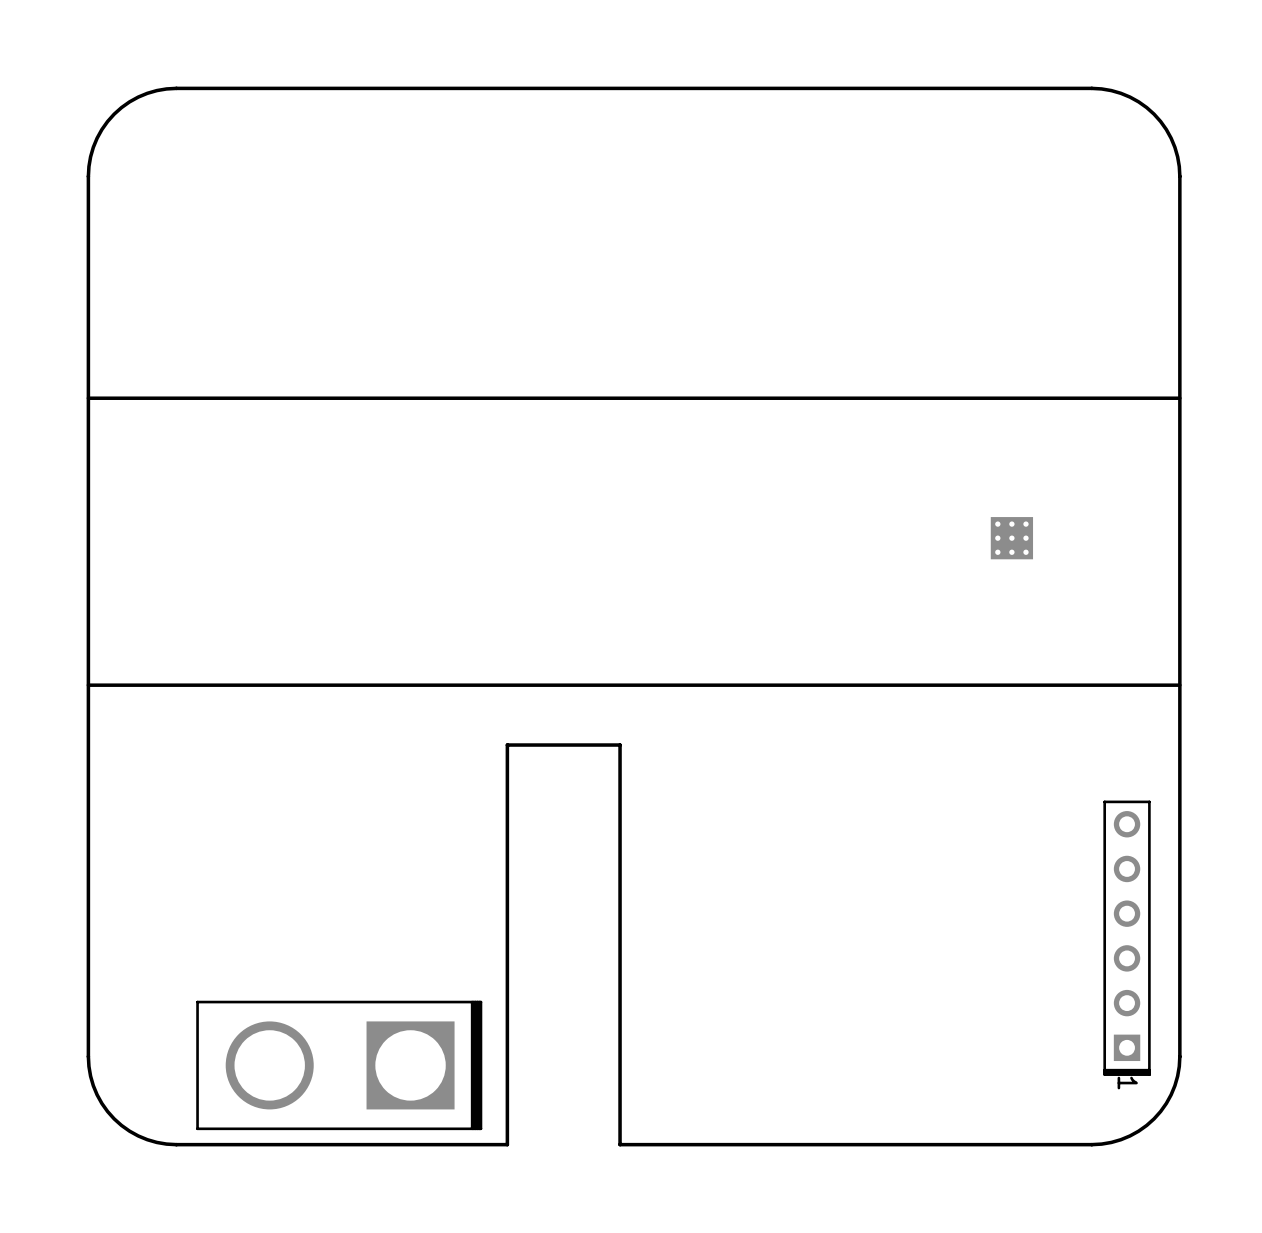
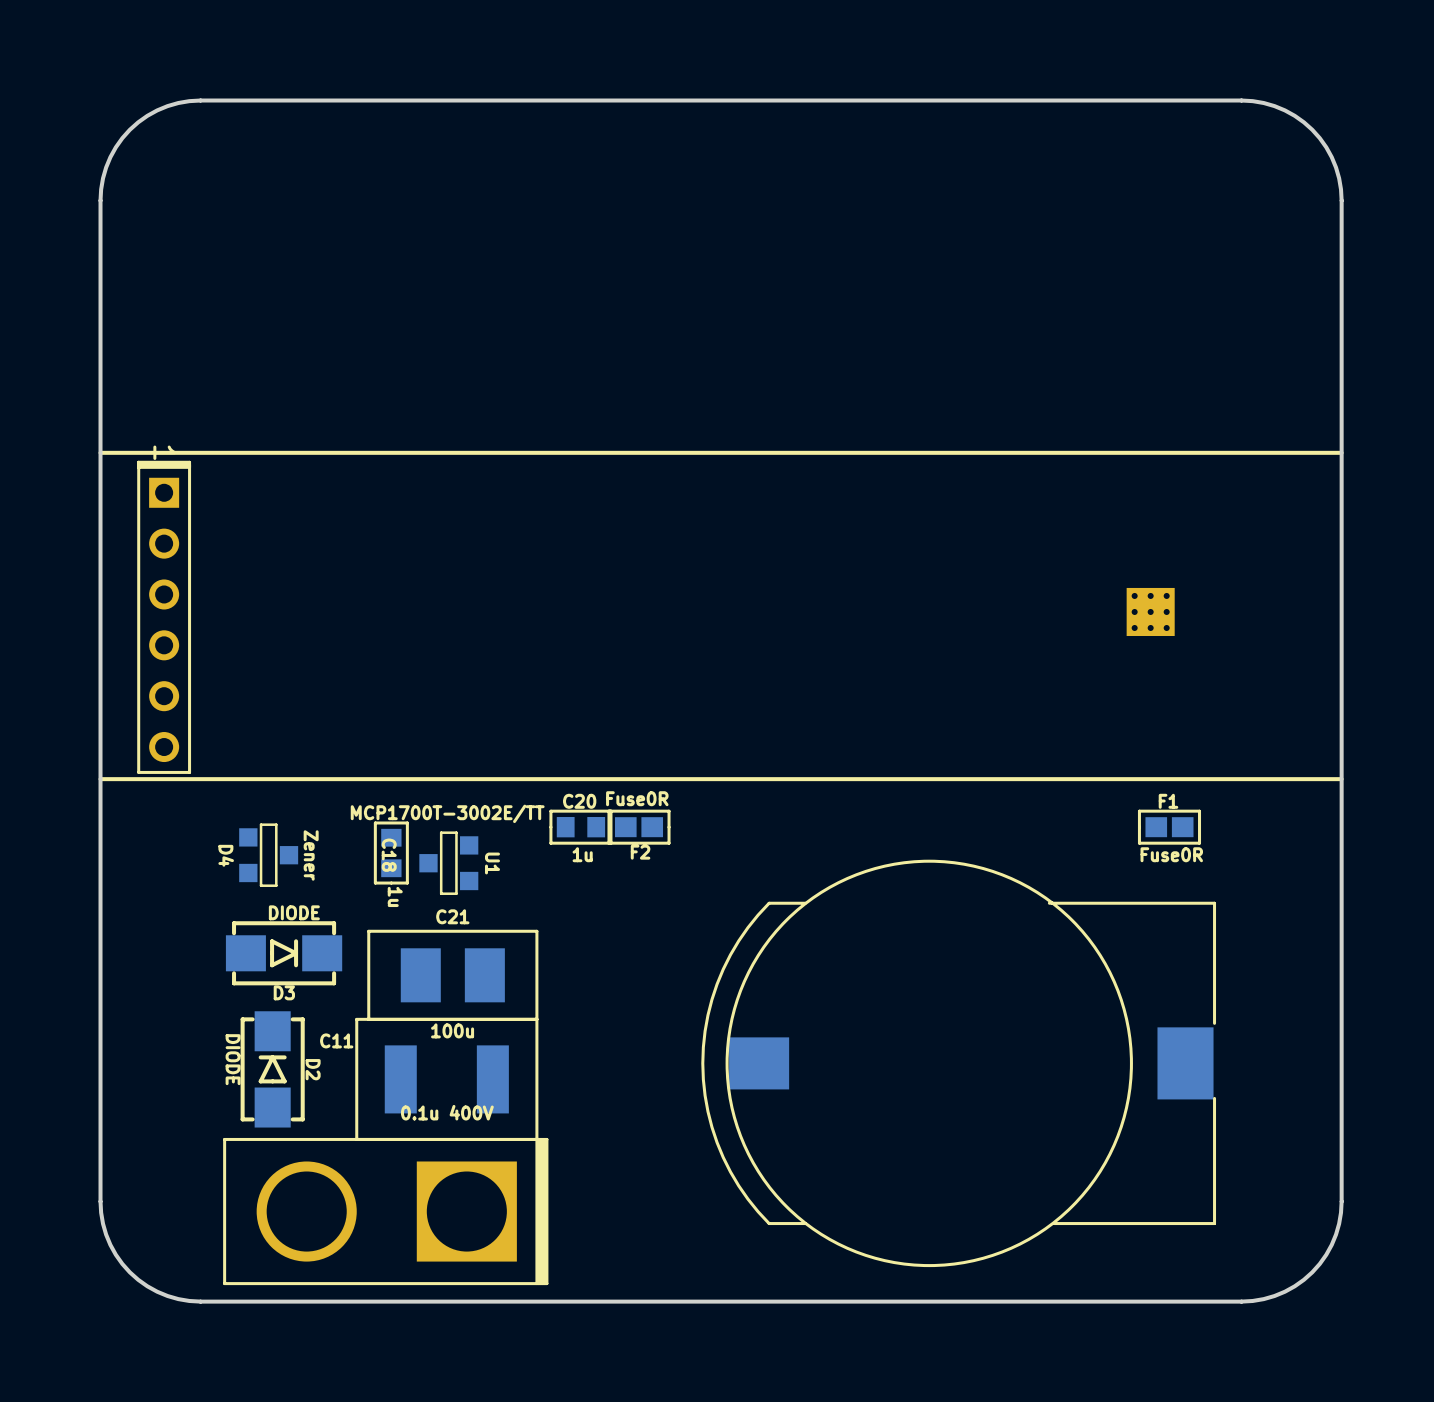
part: none -> (164, 617)
C20: none -> 1u (580, 827)
F2: none -> Fuse0R (639, 827)
F1: none -> Fuse0R (1169, 827)
C18: none -> 1u (391, 853)
D4: none -> Zener (268, 855)
U1: none -> MCP1700T-3002E/TT (448, 863)
D3: none -> DIODE (284, 953)
C21: none -> 100u (452, 975)
part: none -> (958, 1063)
part: (1127, 938) -> none
D2: none -> DIODE (272, 1069)
C11: none -> 0.1u 400V (446, 1079)
board edge: (620, 1144) (620, 745) (507, 745) (507, 1144) -> (705, 1301) (576, 1301)

